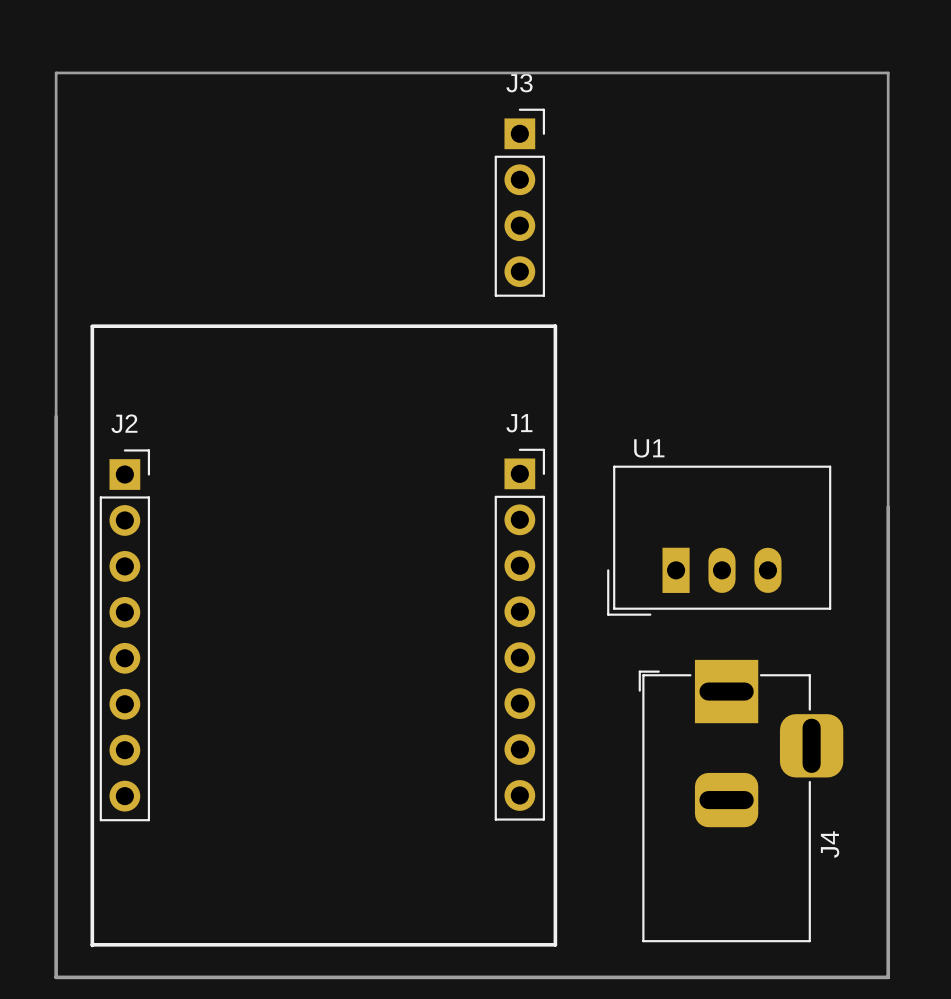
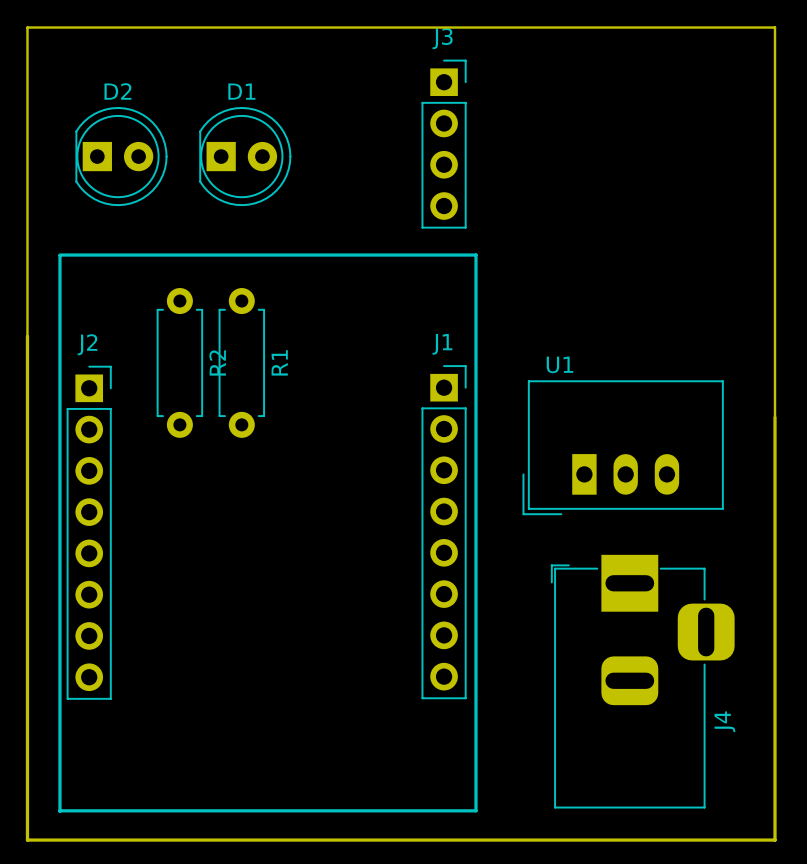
D2: none -> (121, 156)
D1: none -> (245, 156)
R2: none -> (179, 362)
R1: none -> (241, 362)

